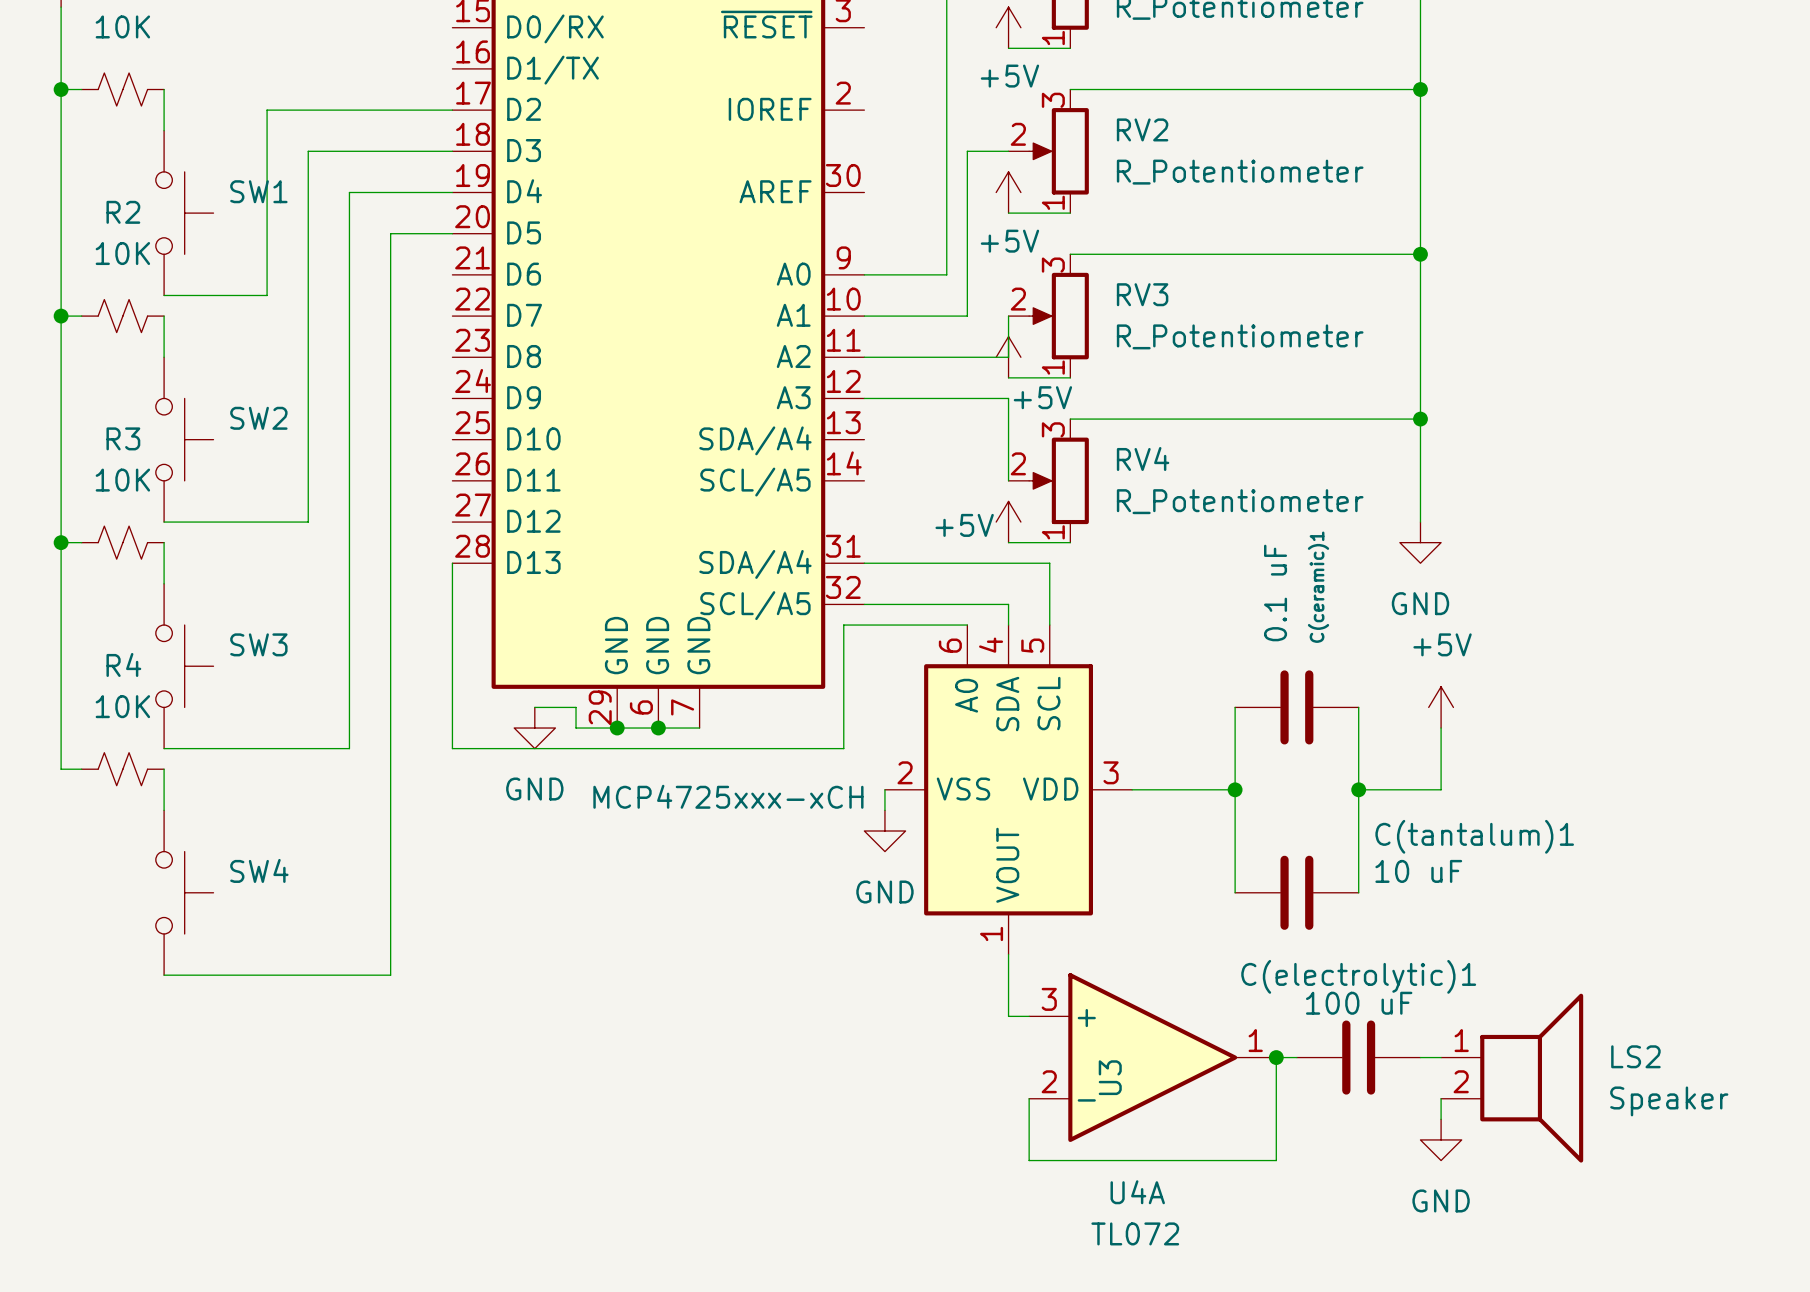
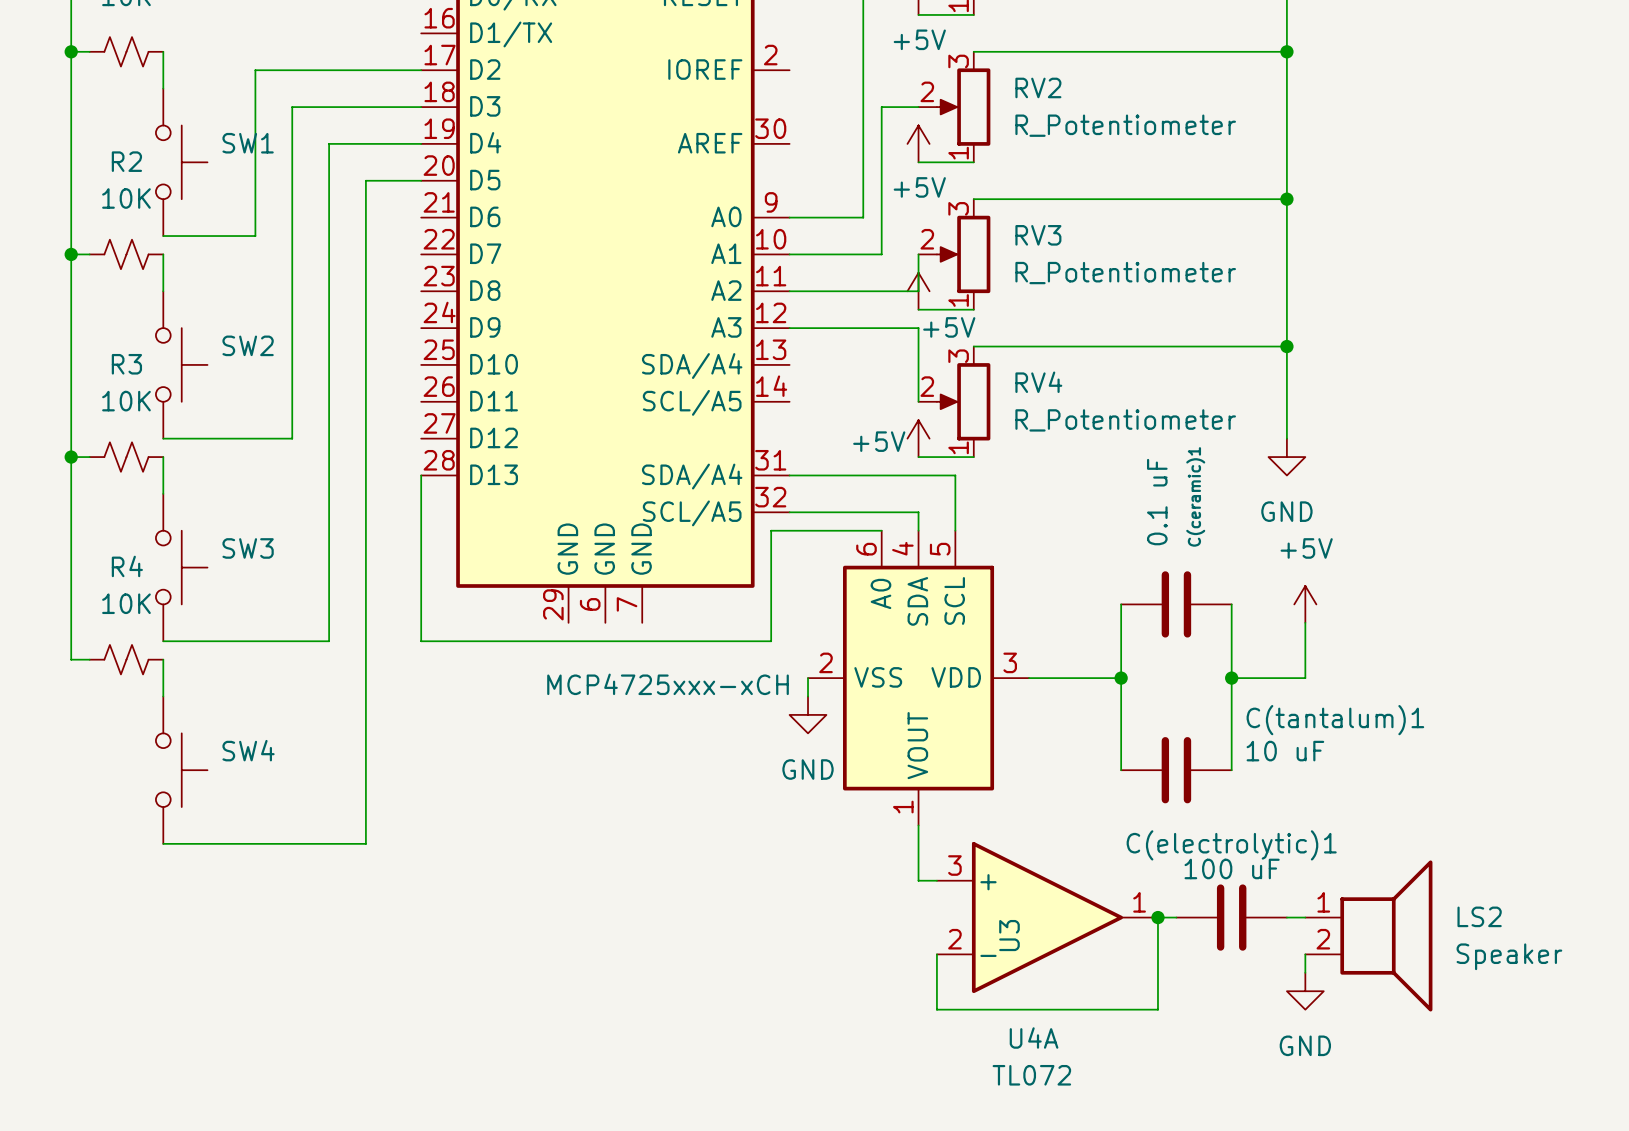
wire: (534, 707) (576, 707) (576, 728) (699, 728) -> none
power symbol: GND (534, 728) -> none
junction: (617, 728) -> none
junction: (658, 728) -> none

